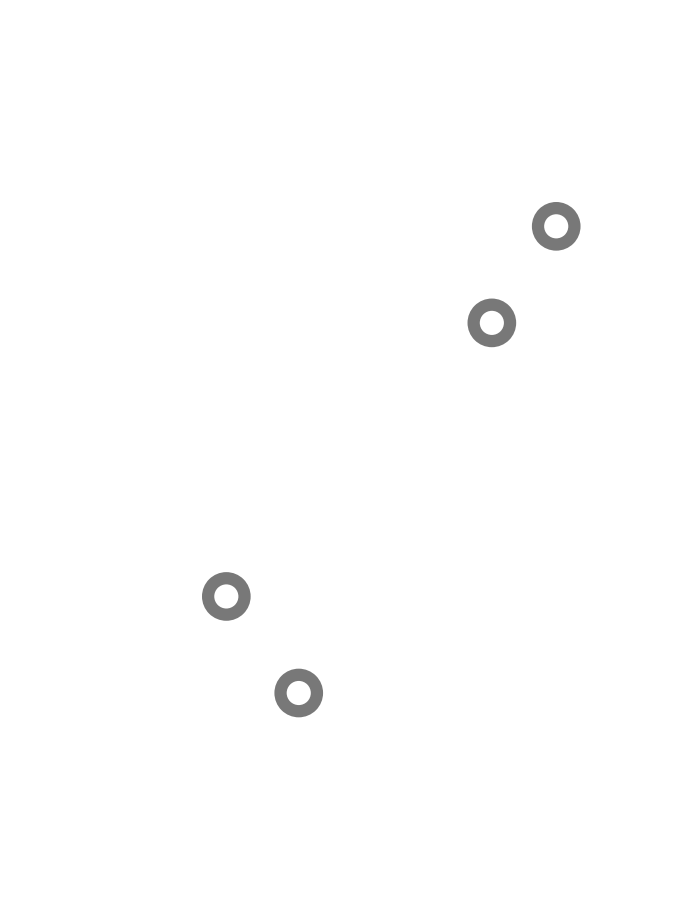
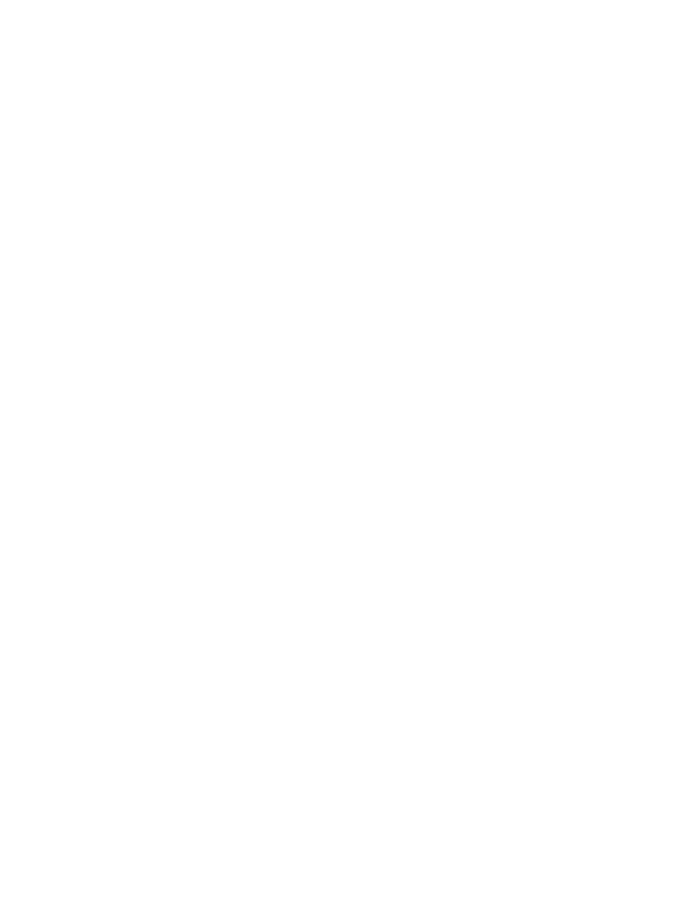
via: (556, 226) -> none
via: (491, 322) -> none
via: (226, 596) -> none
via: (298, 693) -> none

